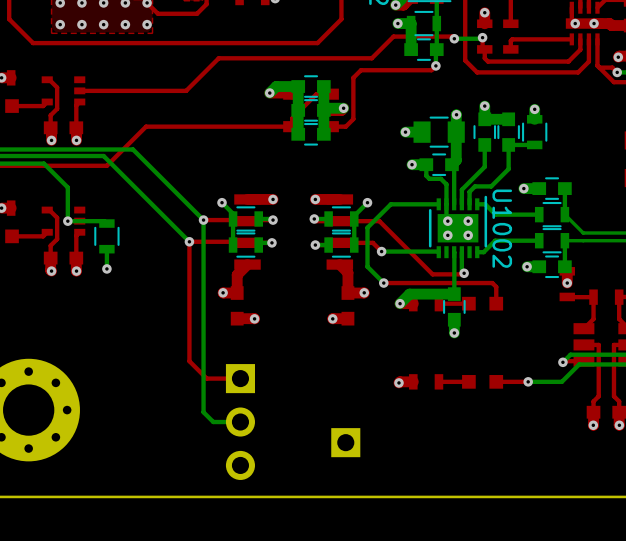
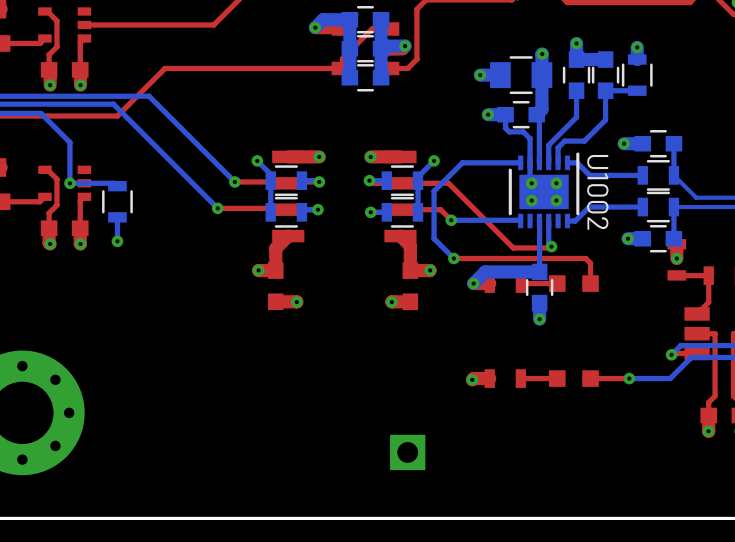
bottom track: (203, 220) (203, 412) (213, 422) (240, 422) -> none
top track: (189, 241) (189, 361) (206, 378) (240, 378) -> none
part: (240, 422) -> none

